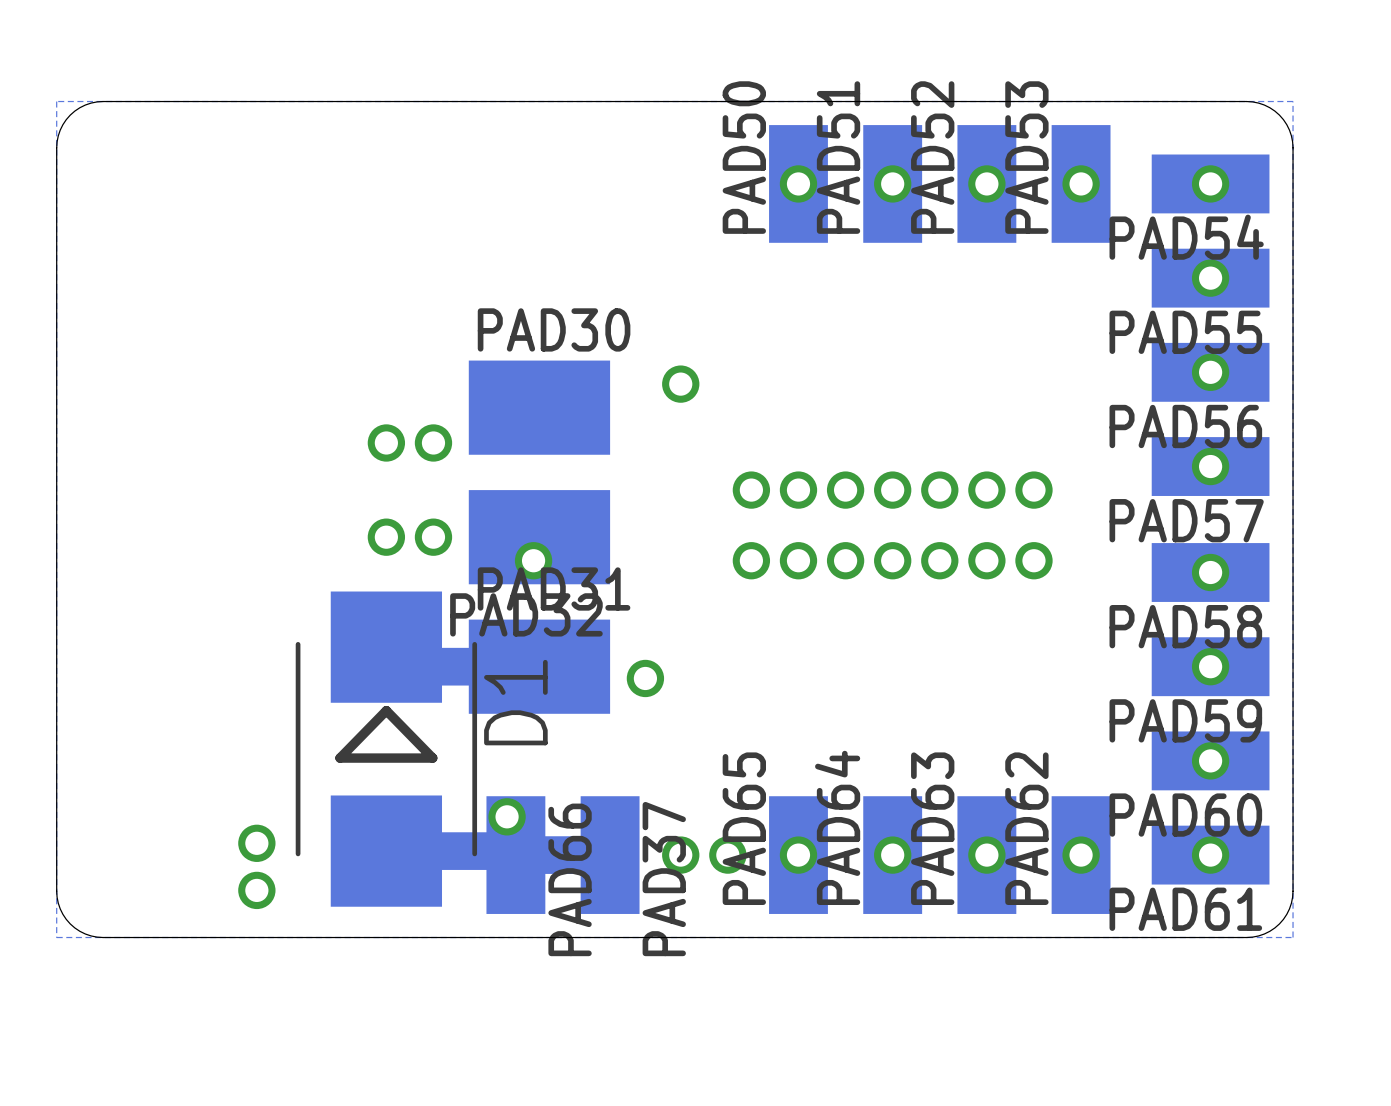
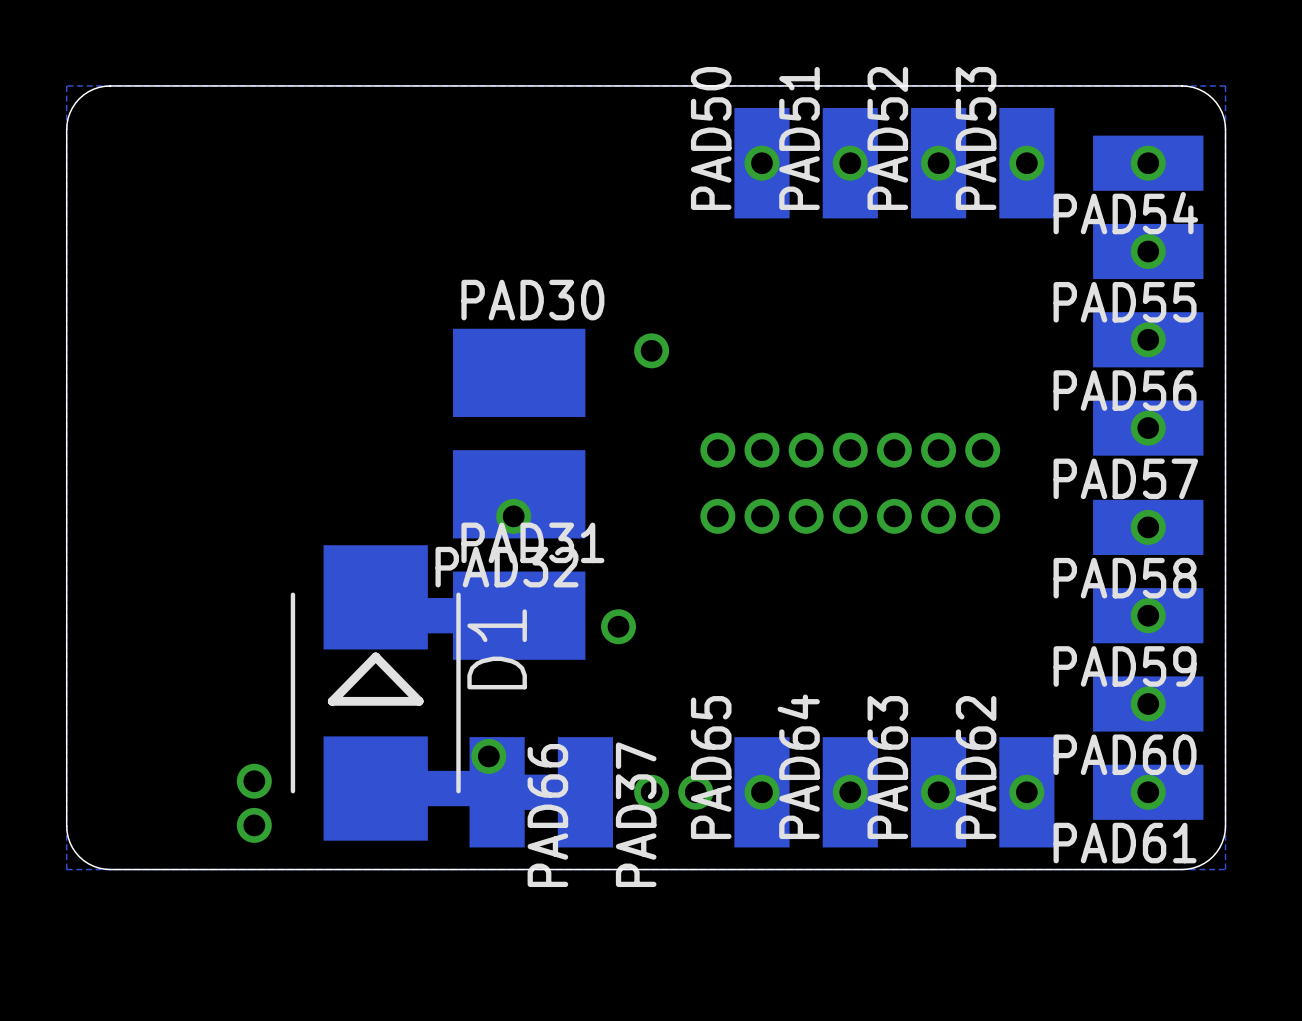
via: (386, 442) -> none
via: (433, 442) -> none
via: (386, 537) -> none
via: (433, 537) -> none

